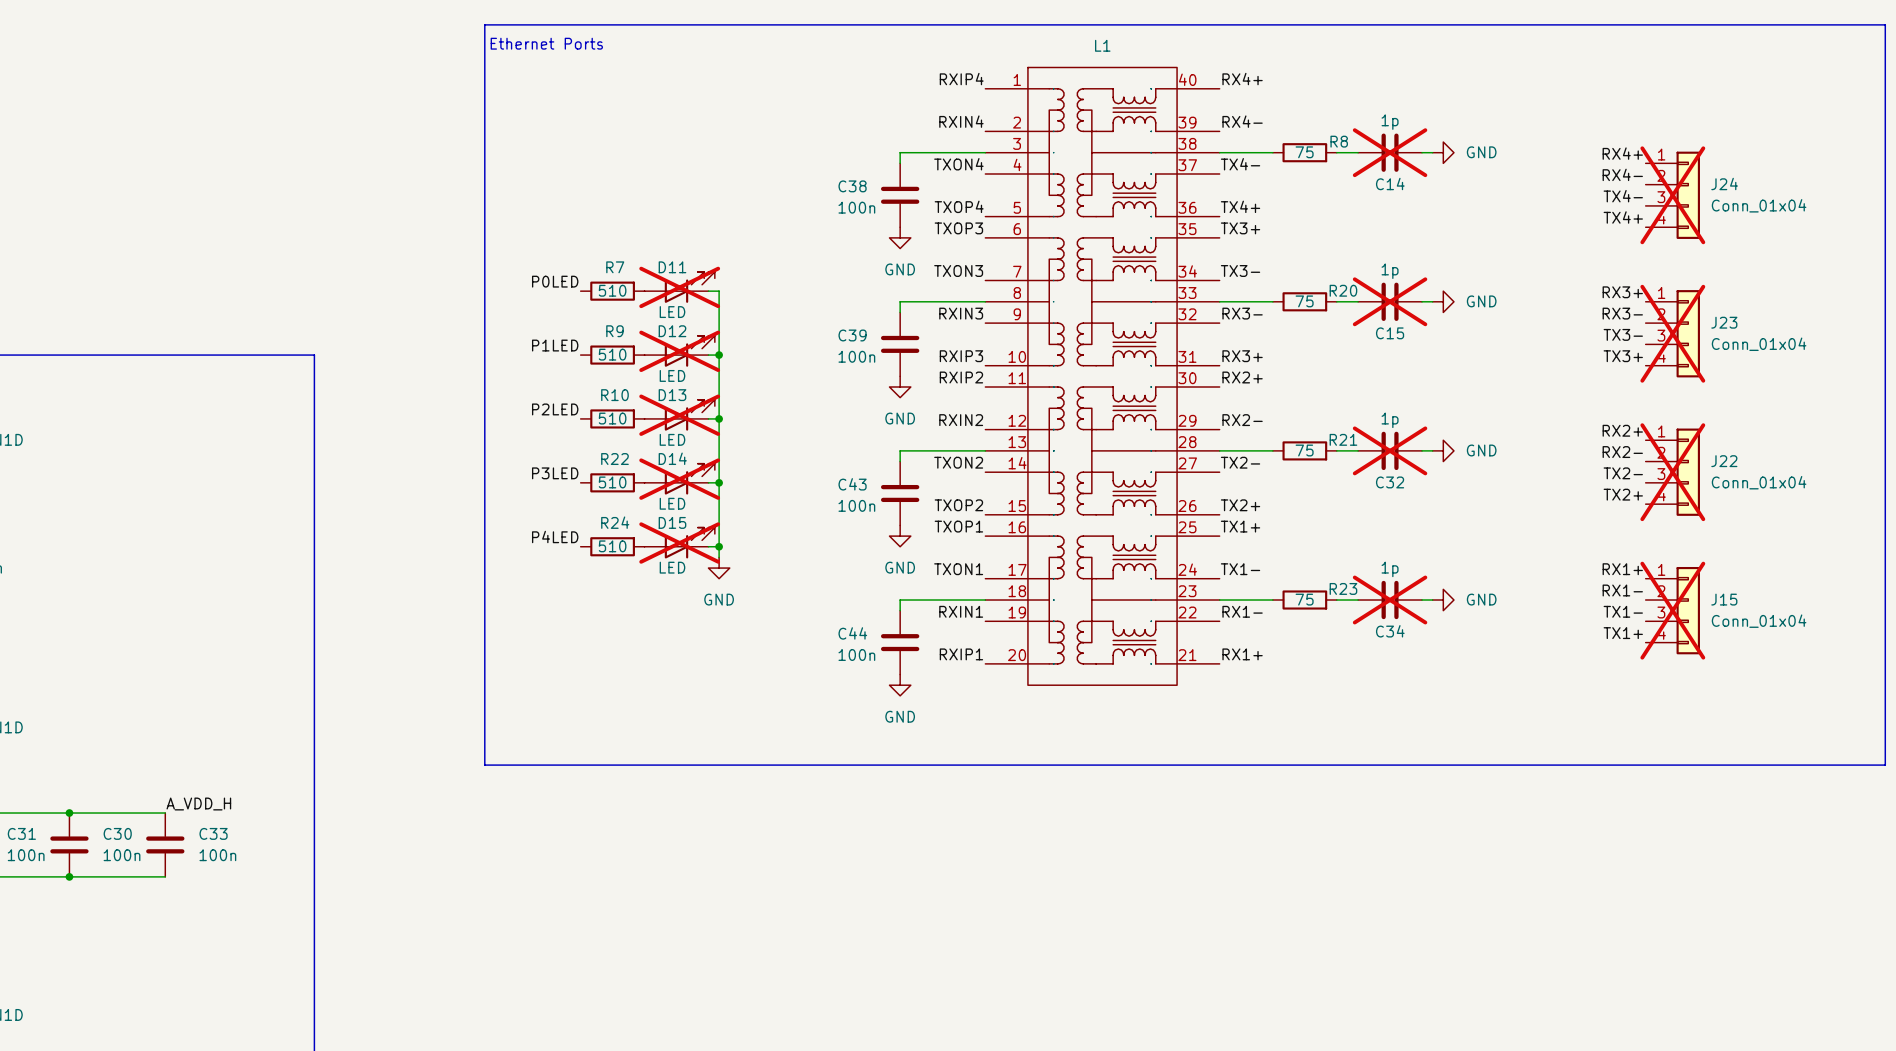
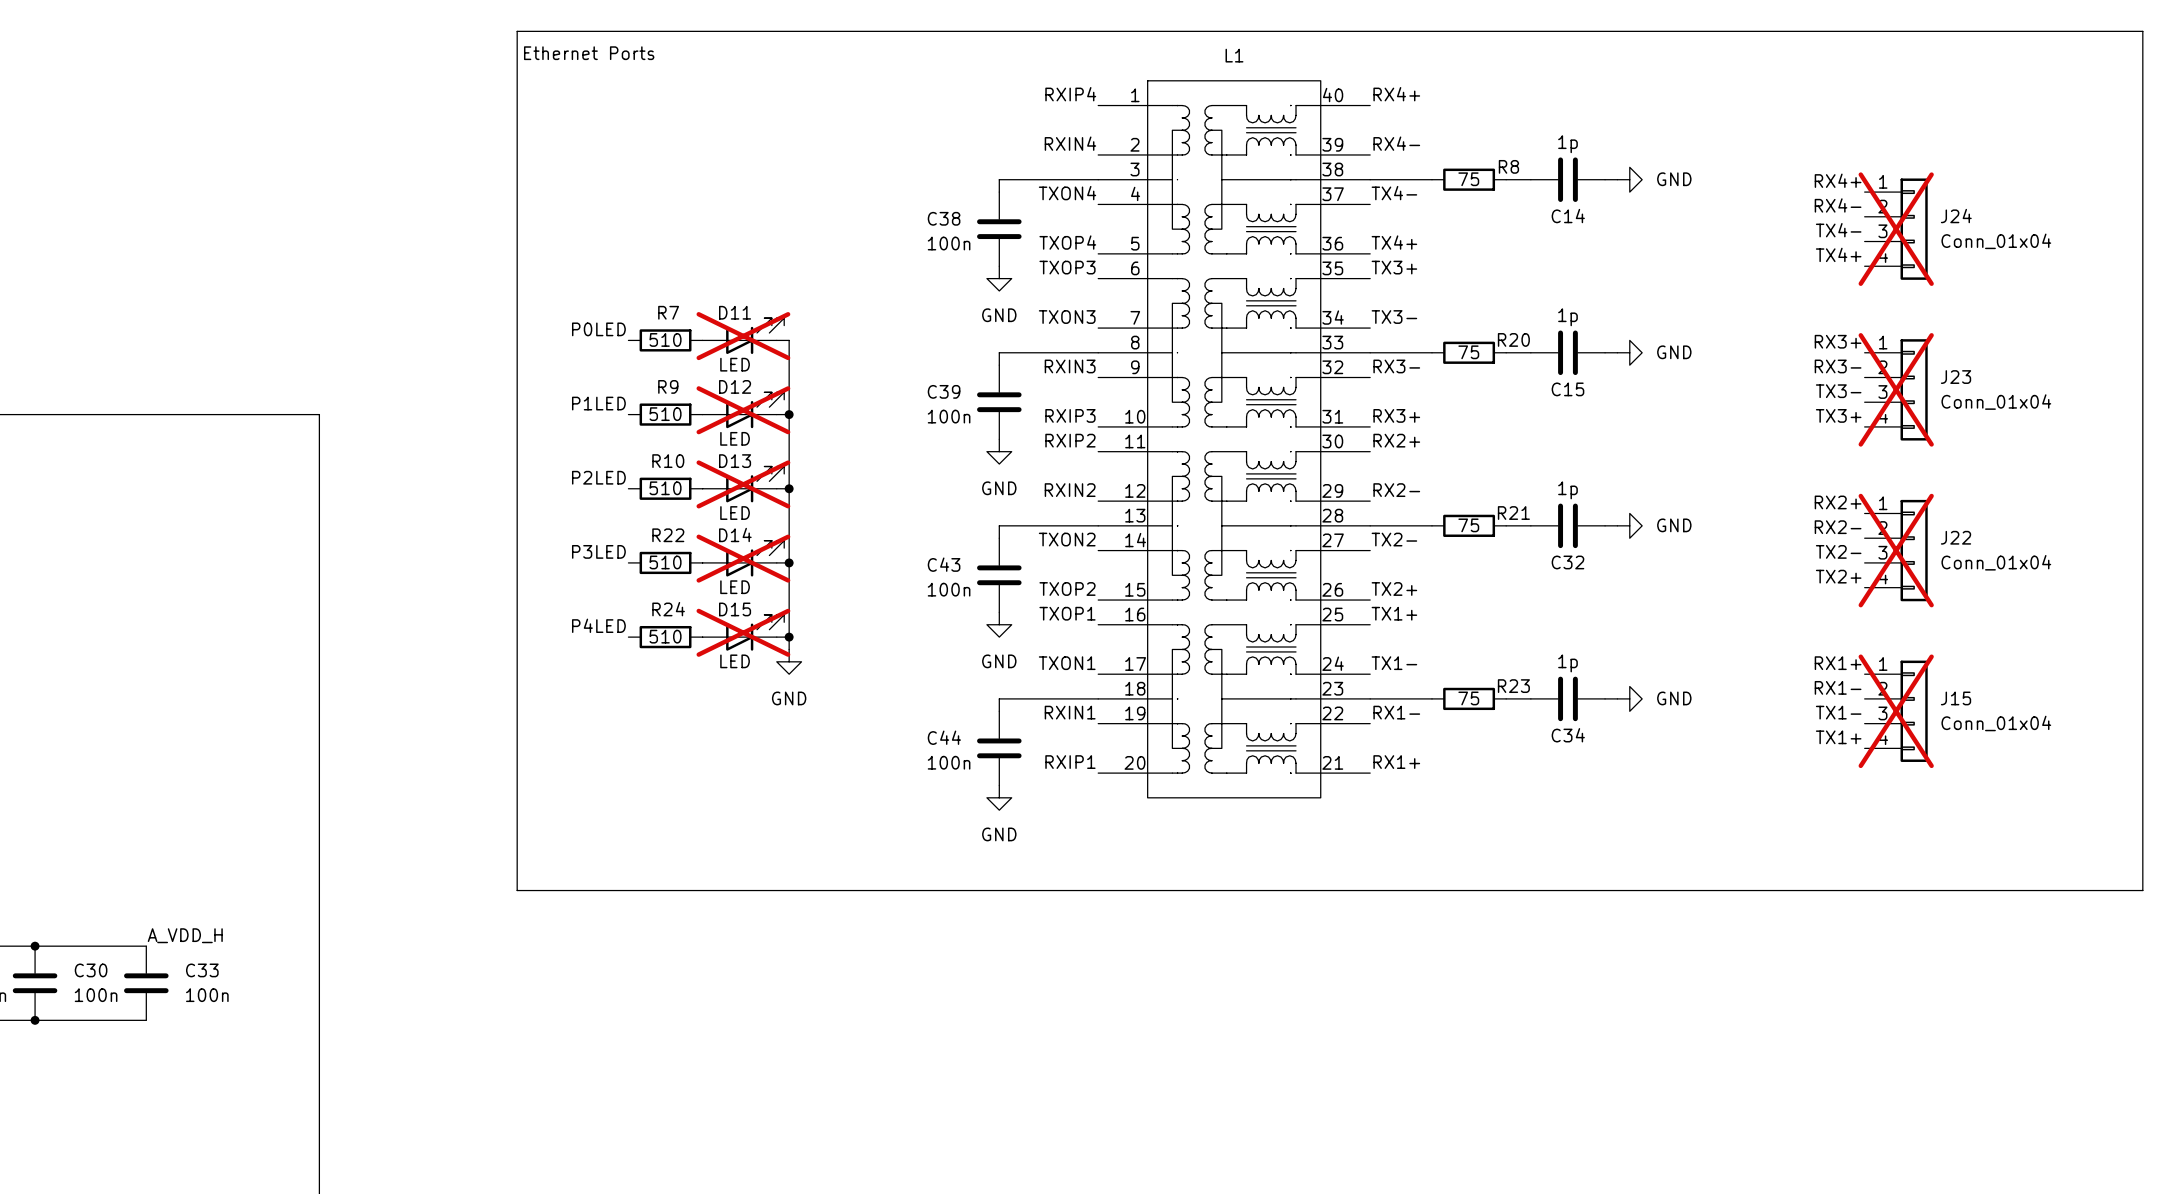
C14 do-not-place cross: (1390, 152) -> none
C15 do-not-place cross: (1390, 301) -> none
C32 do-not-place cross: (1390, 450) -> none
C34 do-not-place cross: (1390, 600) -> none

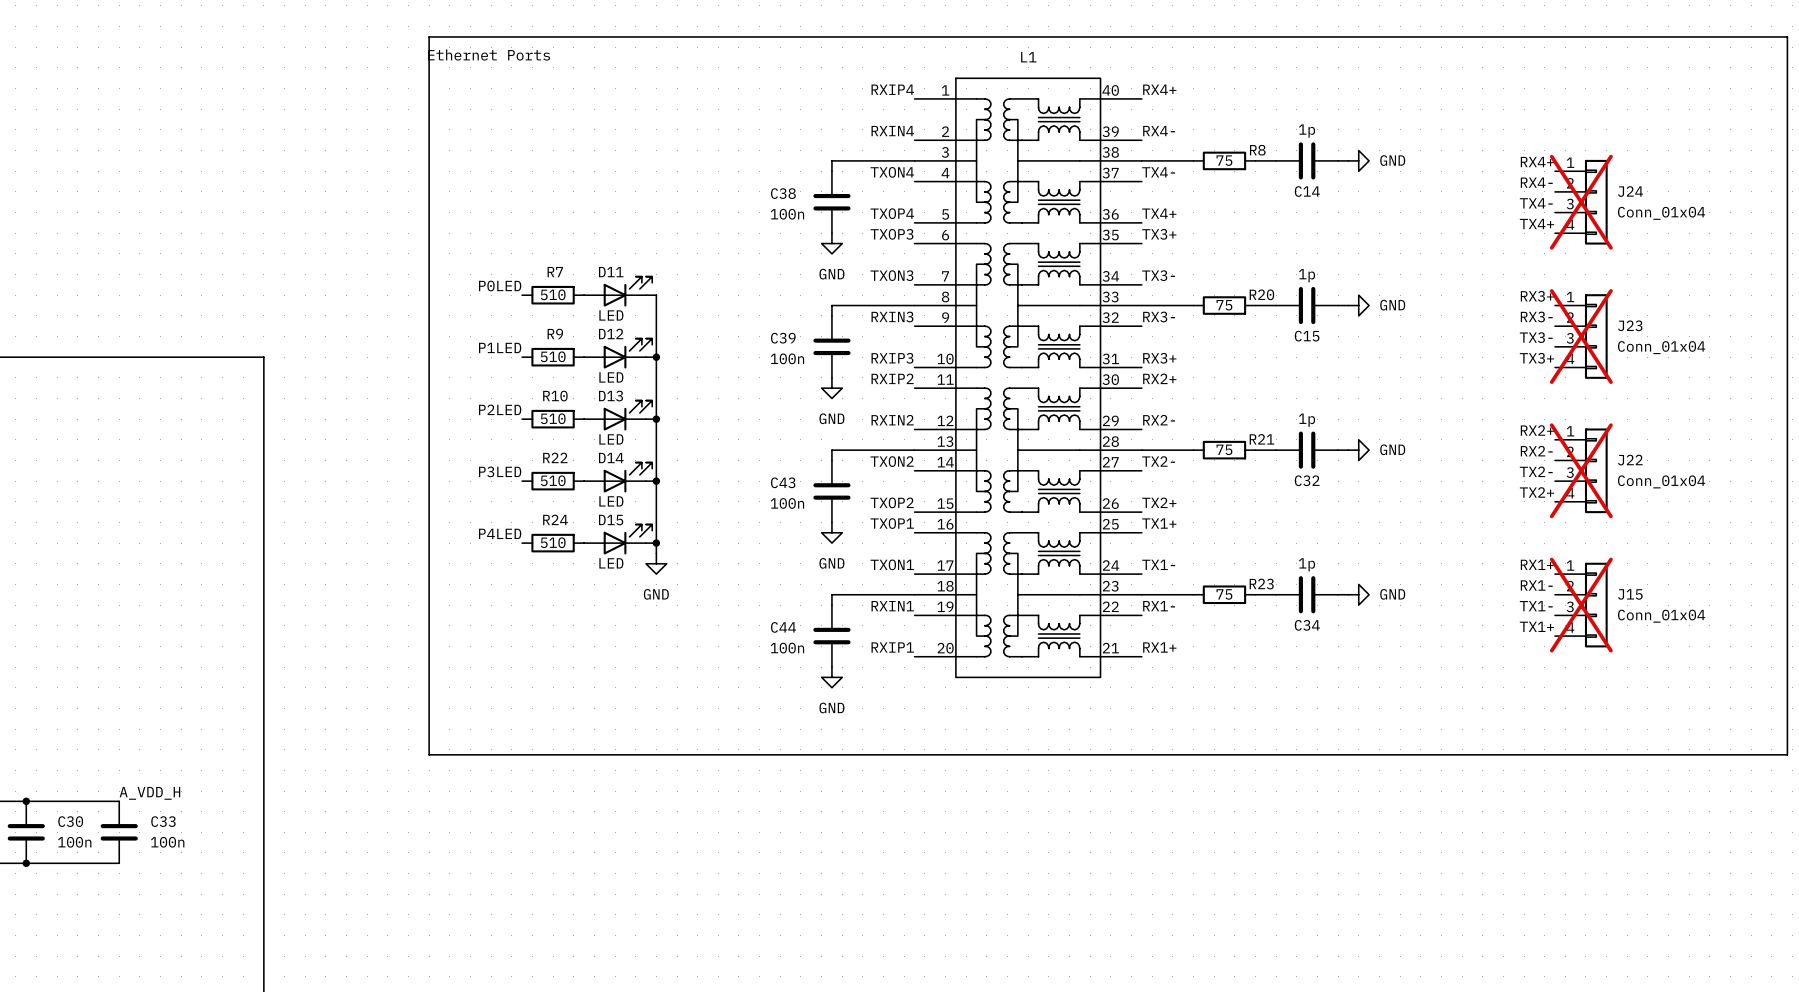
D11 do-not-place cross: (743, 336) -> none
D12 do-not-place cross: (743, 410) -> none
D13 do-not-place cross: (743, 484) -> none
D14 do-not-place cross: (743, 558) -> none
D15 do-not-place cross: (743, 632) -> none

